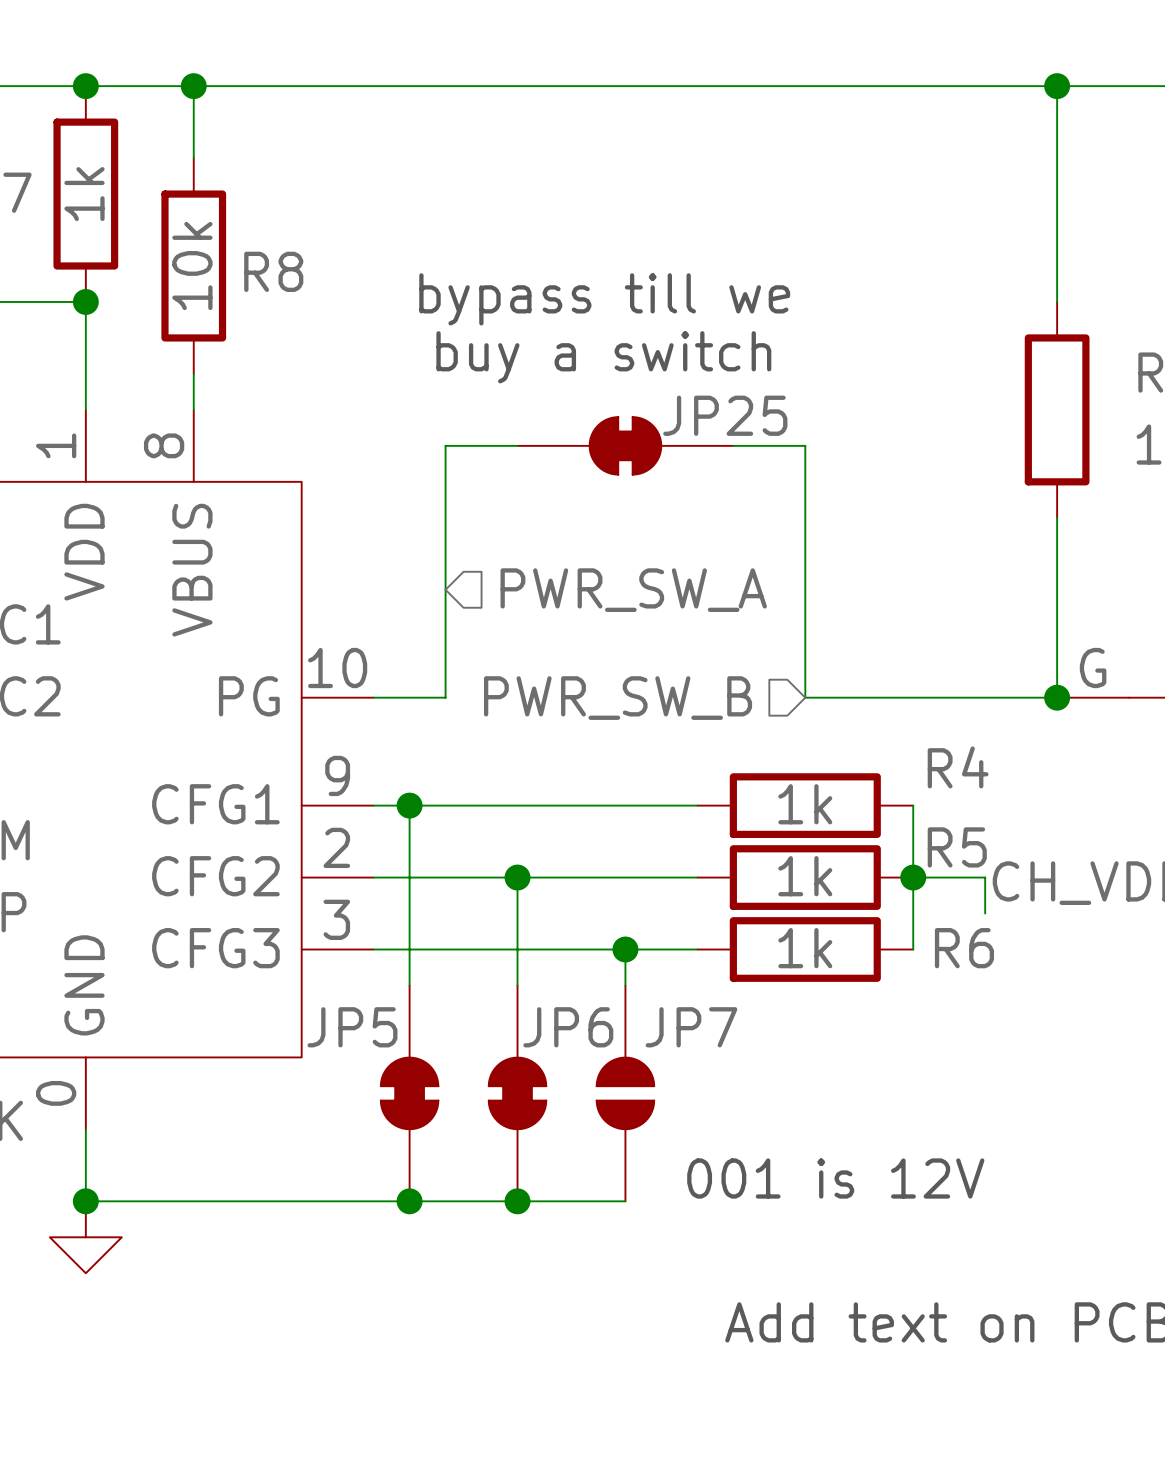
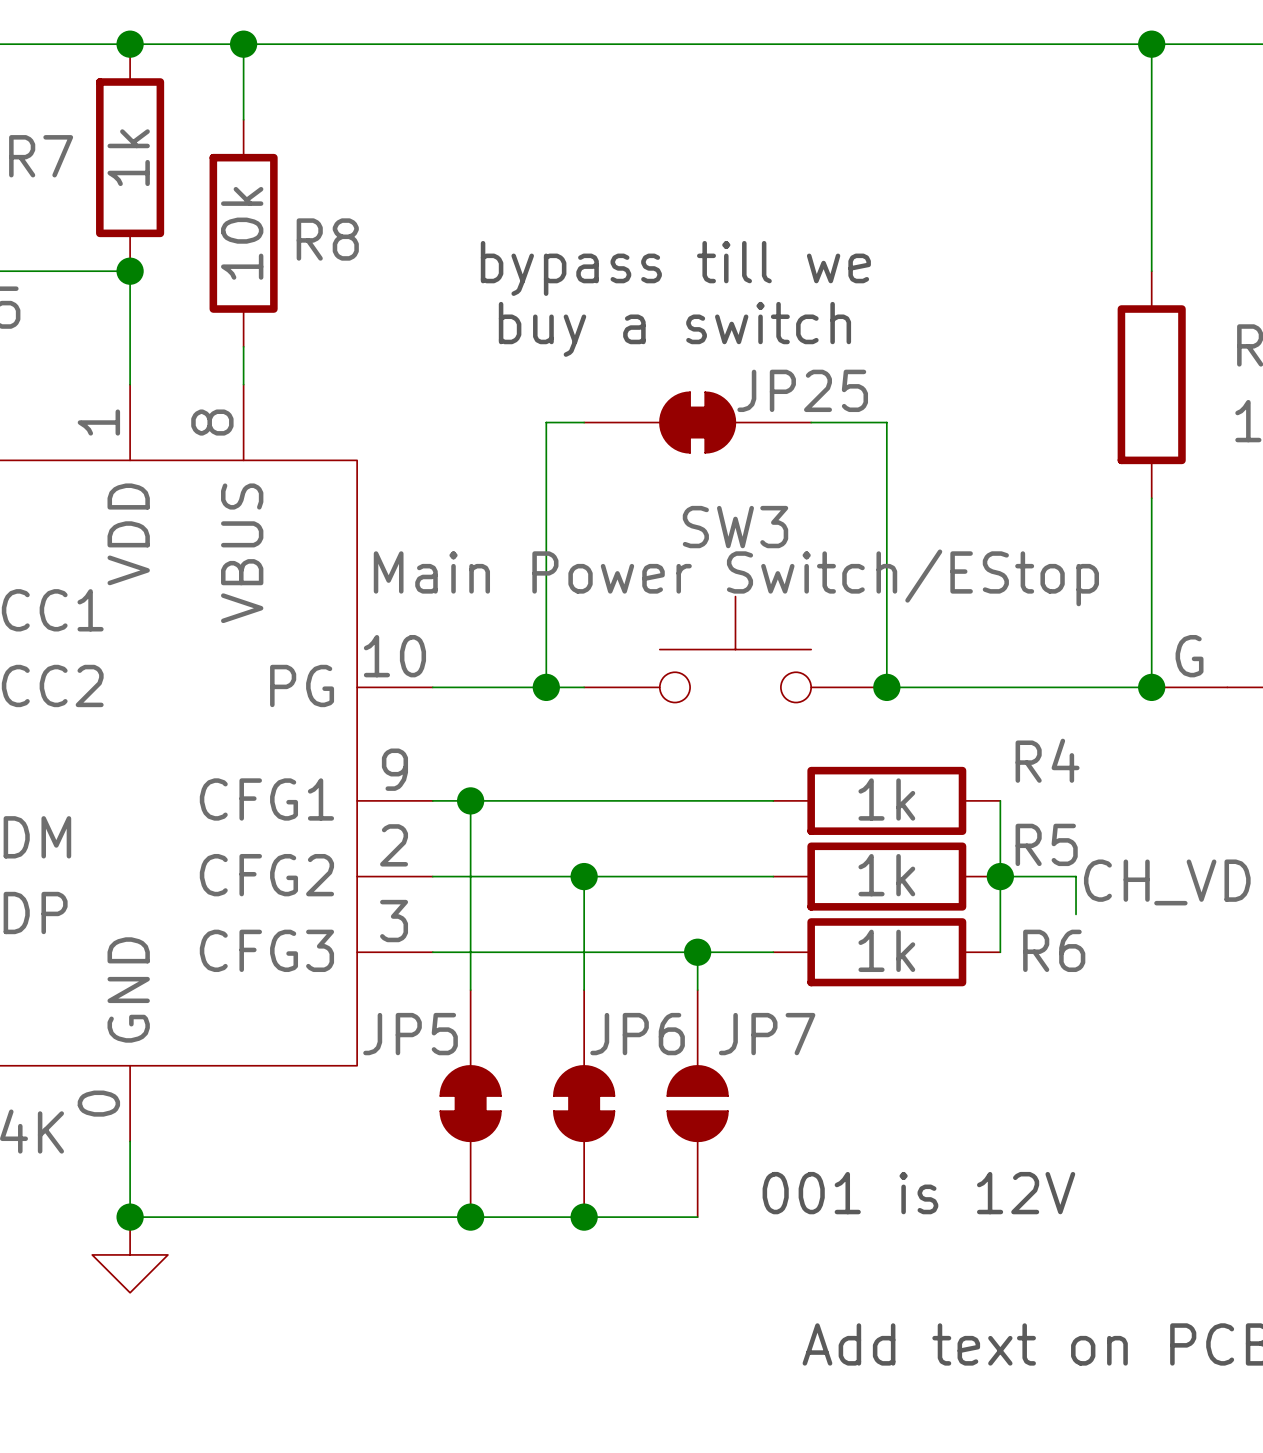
wire: (481, 445) (445, 445) (445, 697) -> (546, 422) (546, 687)
hierarchical label: PWR_SW_A (633, 590) -> none
SW3: none -> Main Power Switch/EStop (735, 649)
wire: none -> (508, 687) (584, 687)
junction: none -> (546, 687)
junction: none -> (886, 687)
hierarchical label: PWR_SW_B (618, 698) -> none

